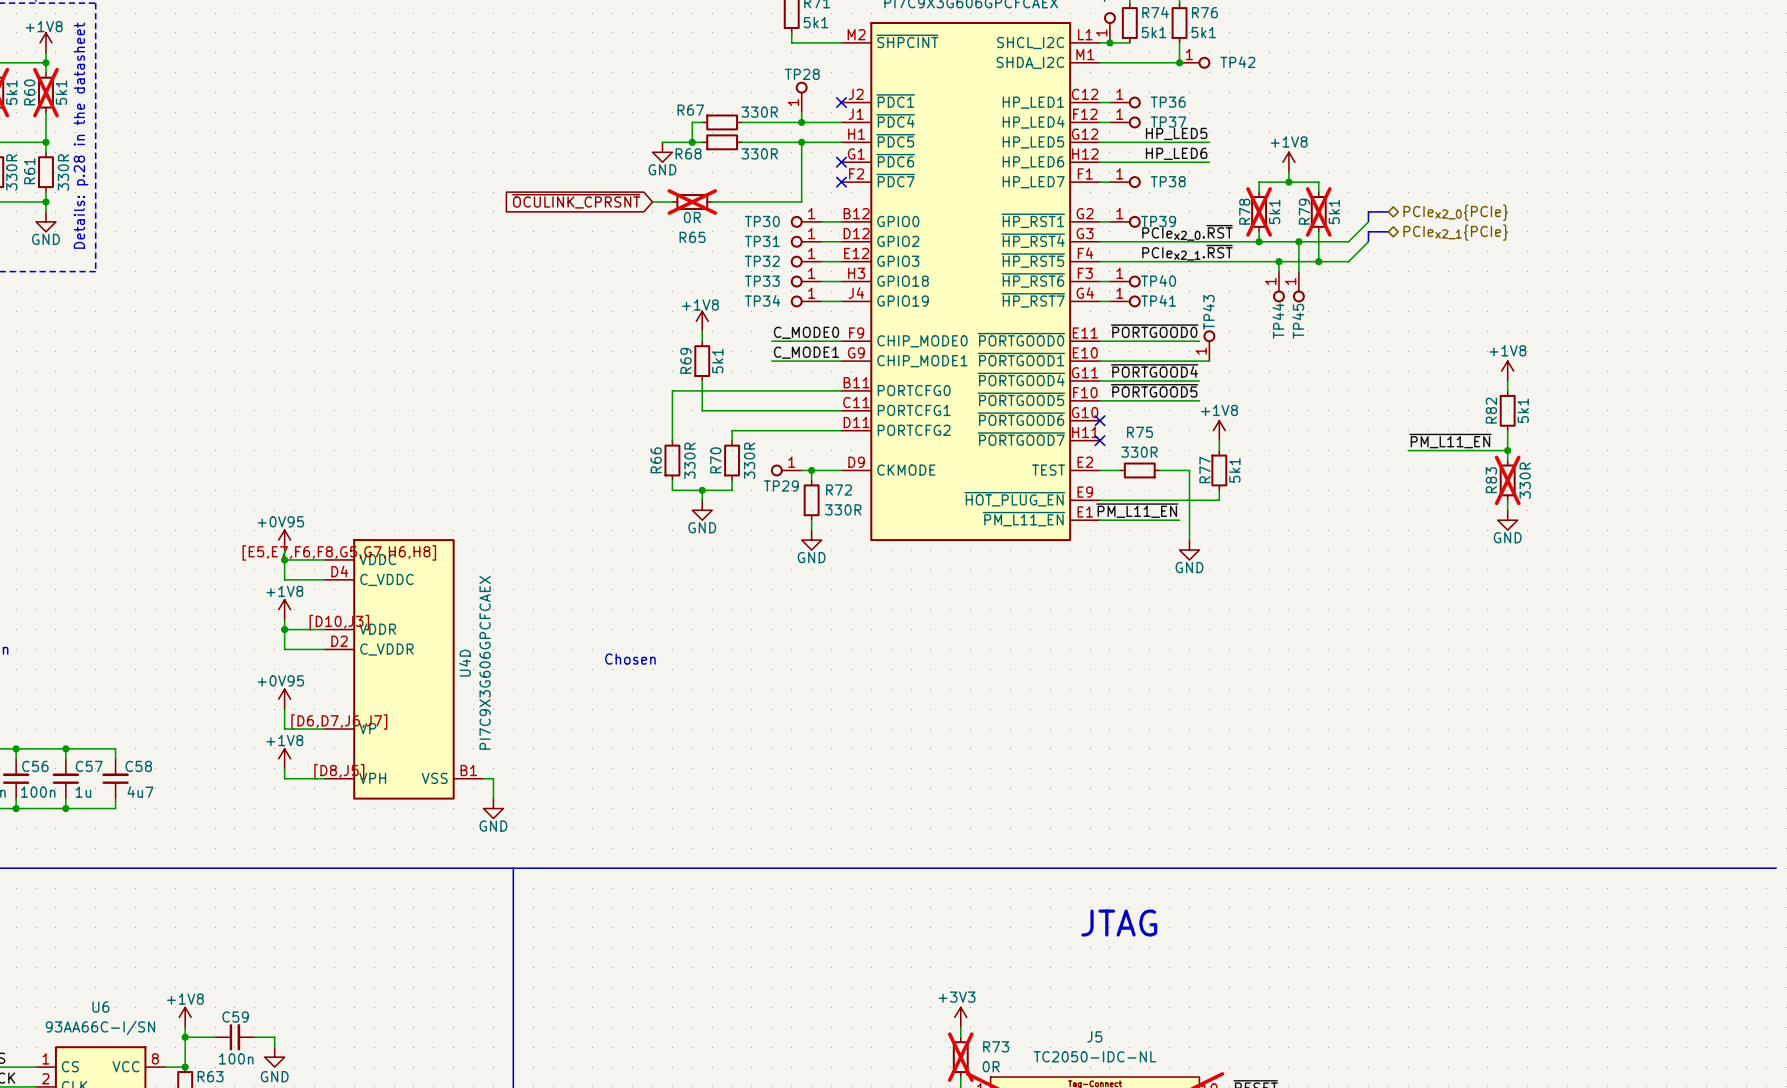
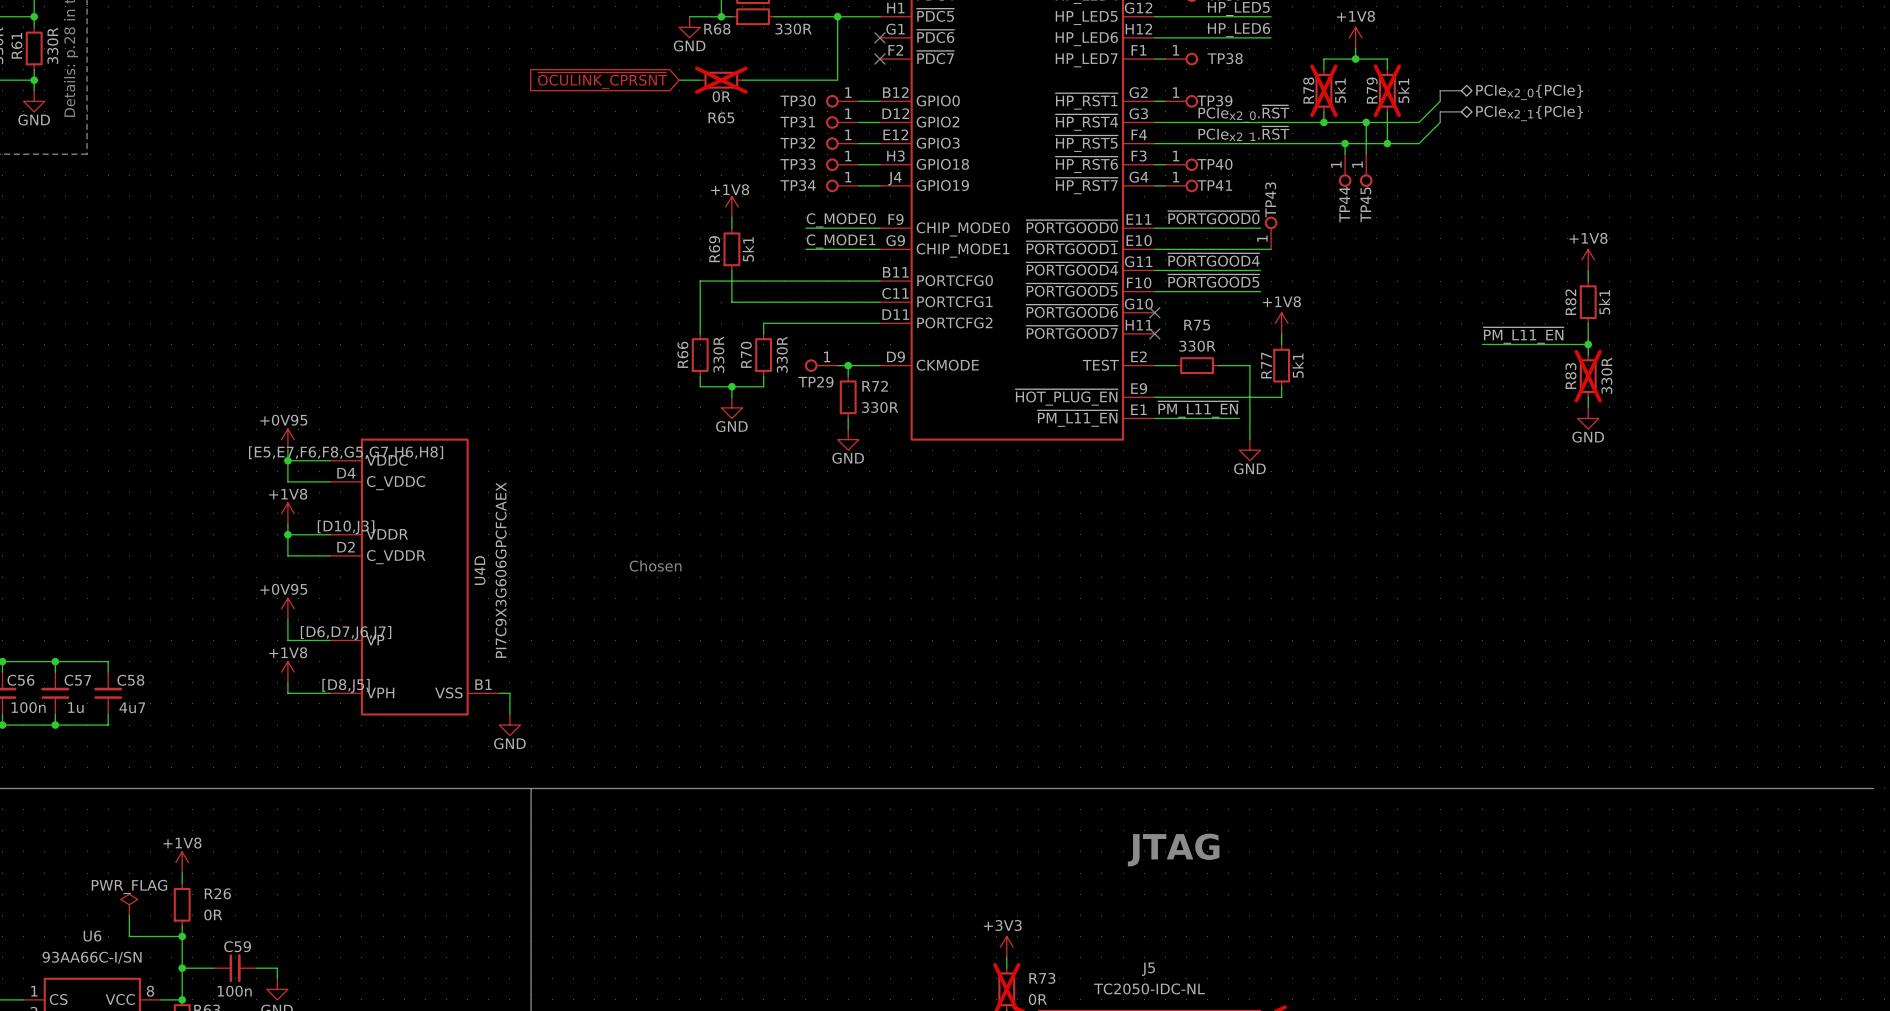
wire: none -> (182, 873) (182, 883)
power symbol: none -> PWR_FLAG (129, 904)
R26: none -> (182, 904)
wire: none -> (129, 915) (129, 936) (182, 936)
junction: none -> (182, 936)
power symbol position: +1V8 (185, 1017) -> +1V8 (182, 862)

